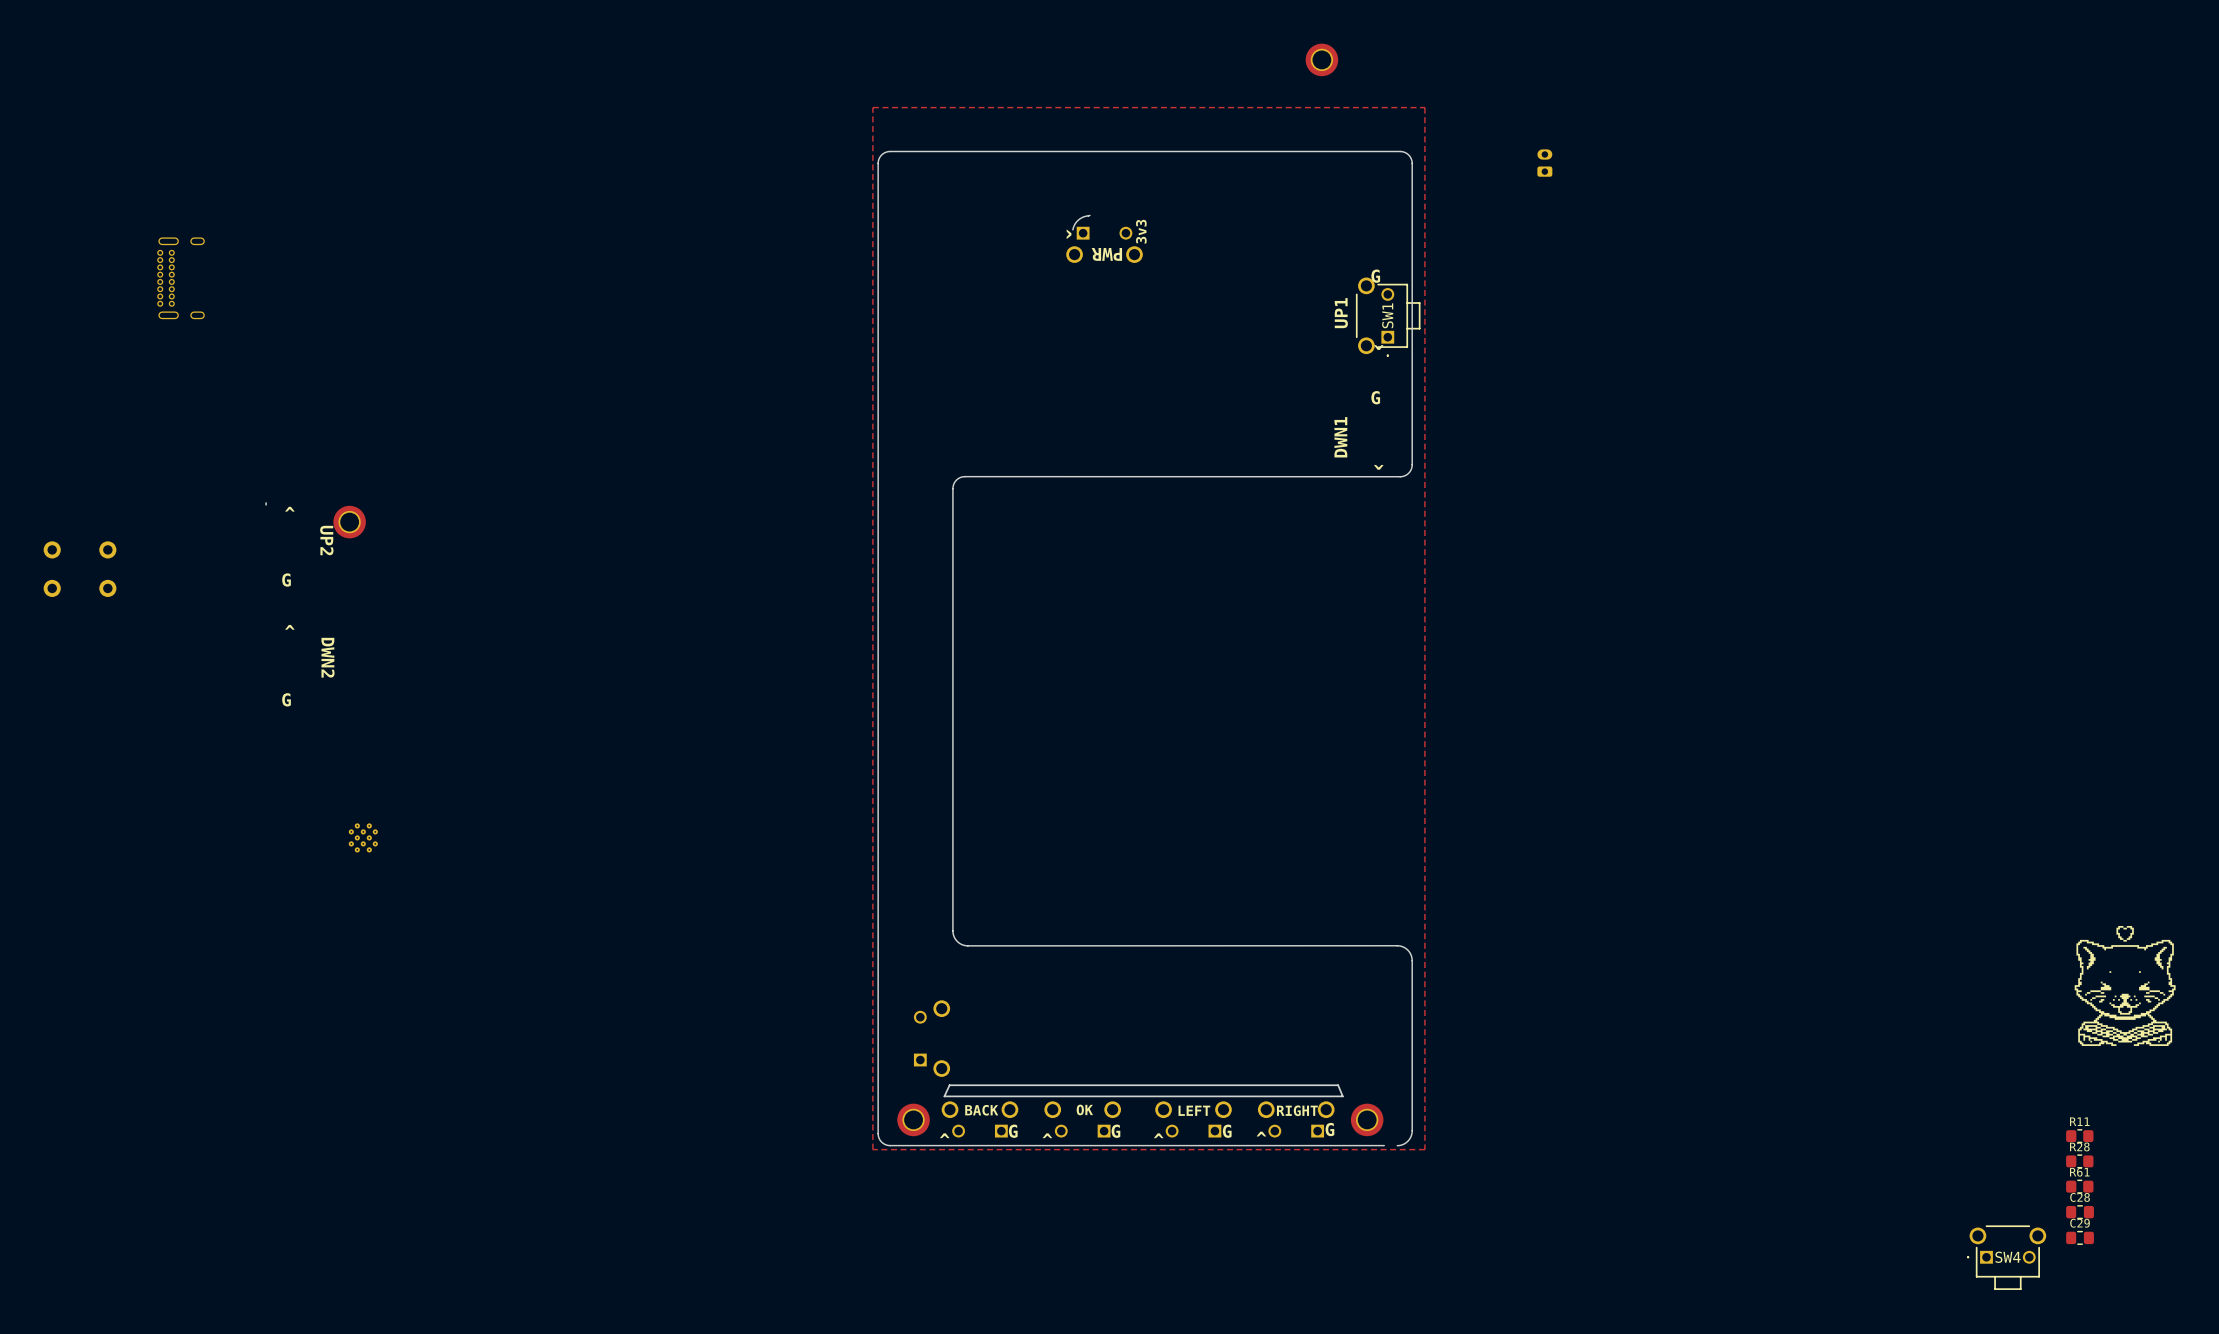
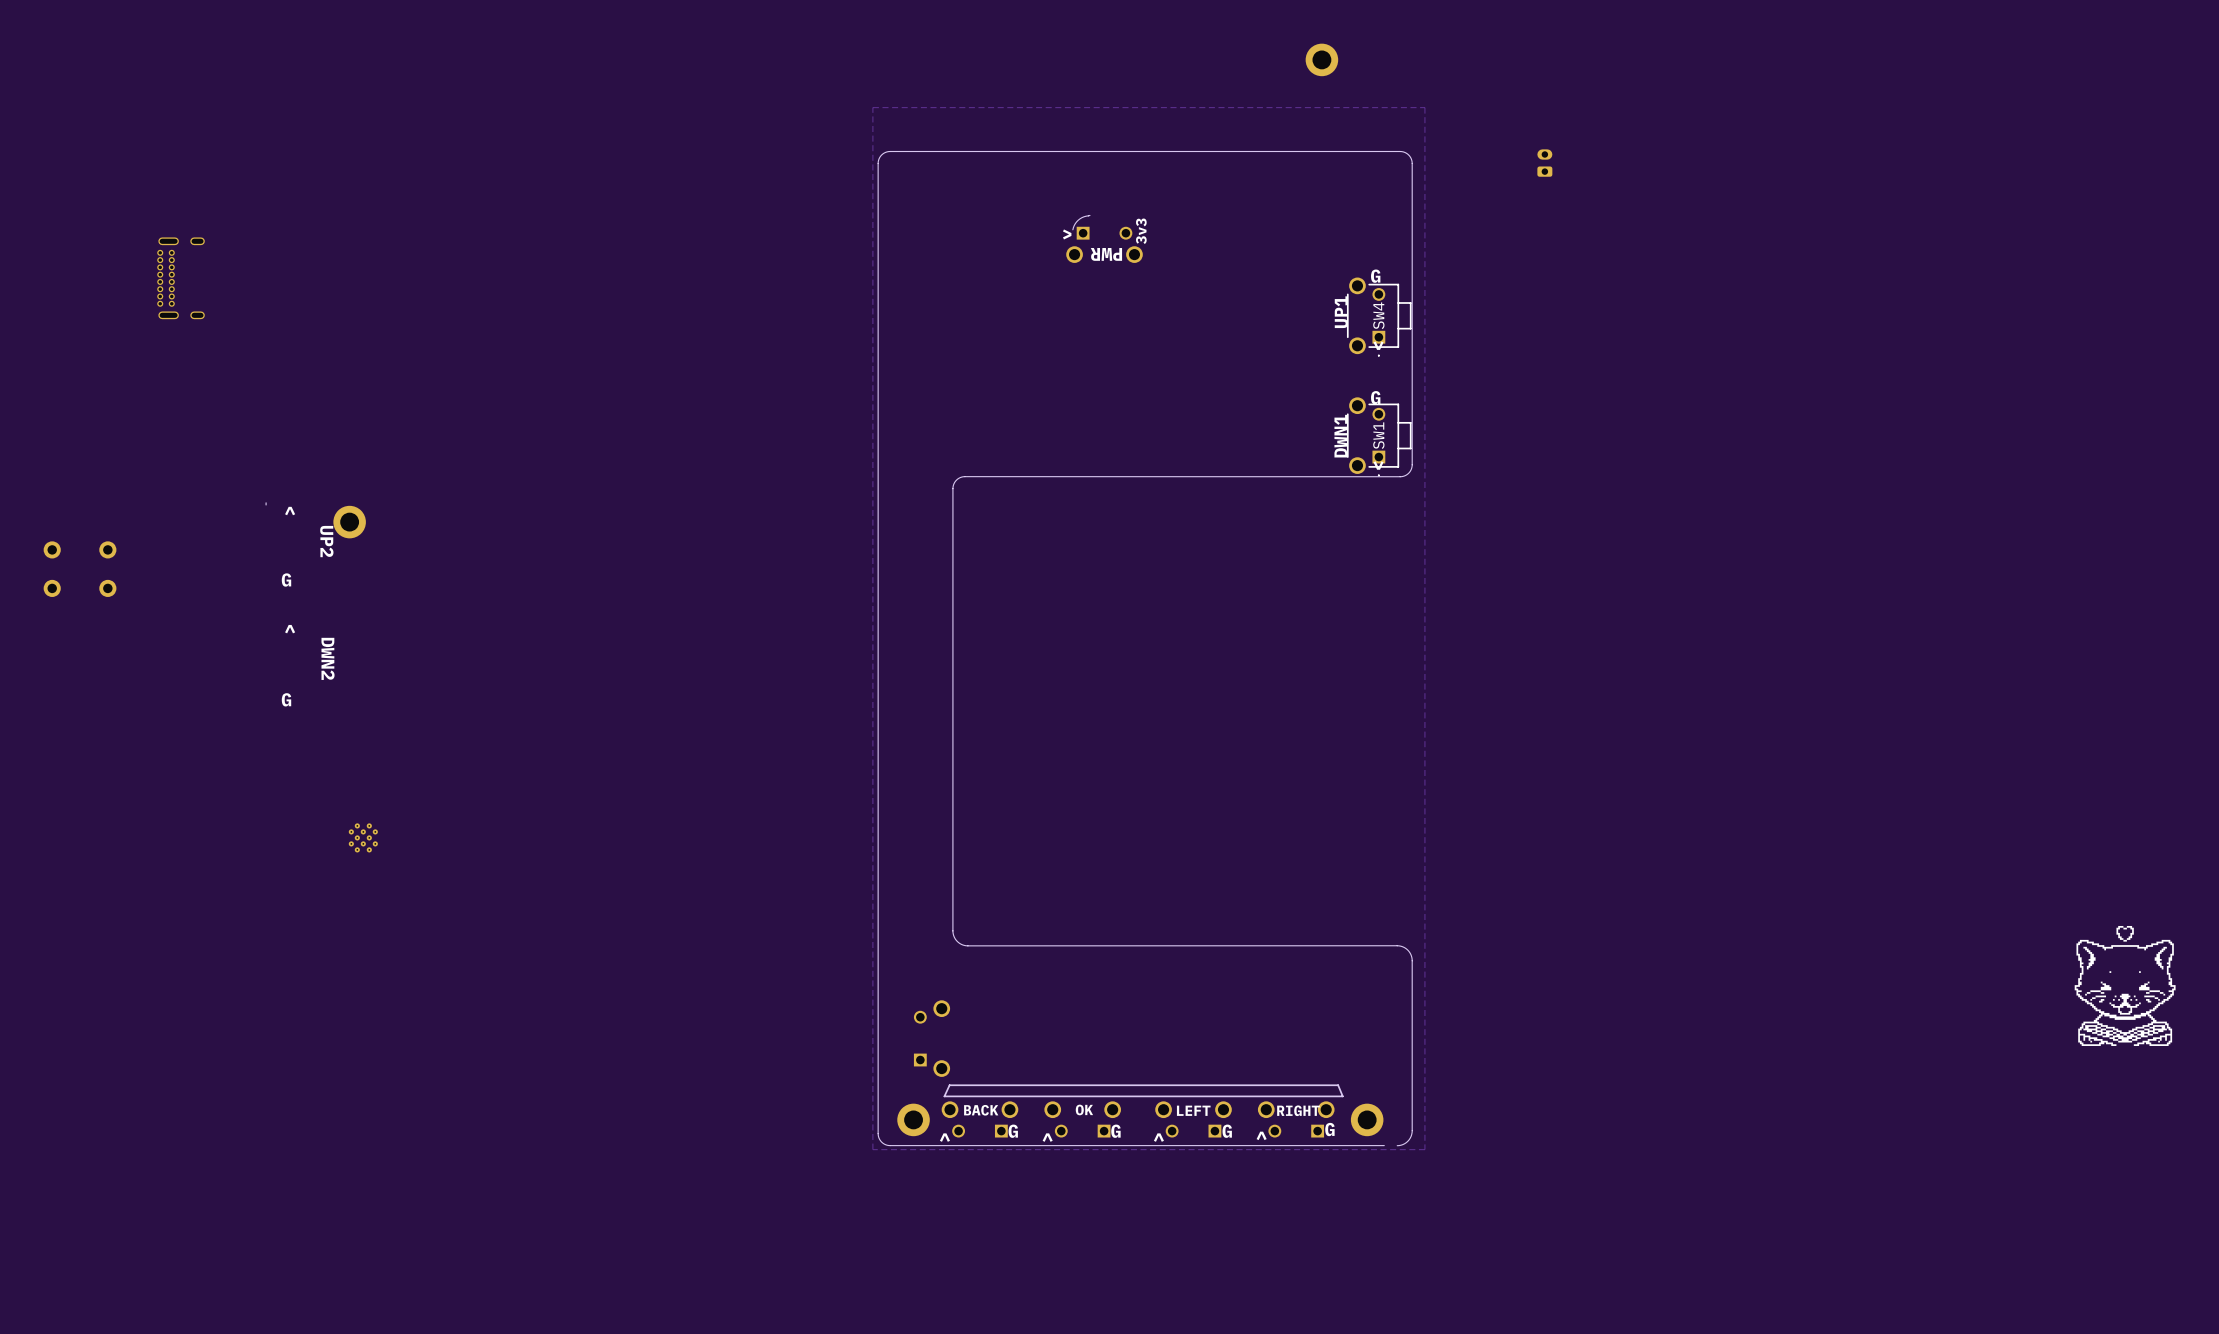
SW1 position: (1388, 317) -> (1379, 436)
R11: (2079, 1136) -> none
R28: (2079, 1161) -> none
R61: (2079, 1186) -> none
C28: (2080, 1212) -> none
C29: (2080, 1237) -> none
SW4 rotation: 0° (2006, 1257) -> 90° counterclockwise (1379, 317)
SW4 position: (2006, 1257) -> (1379, 317)

